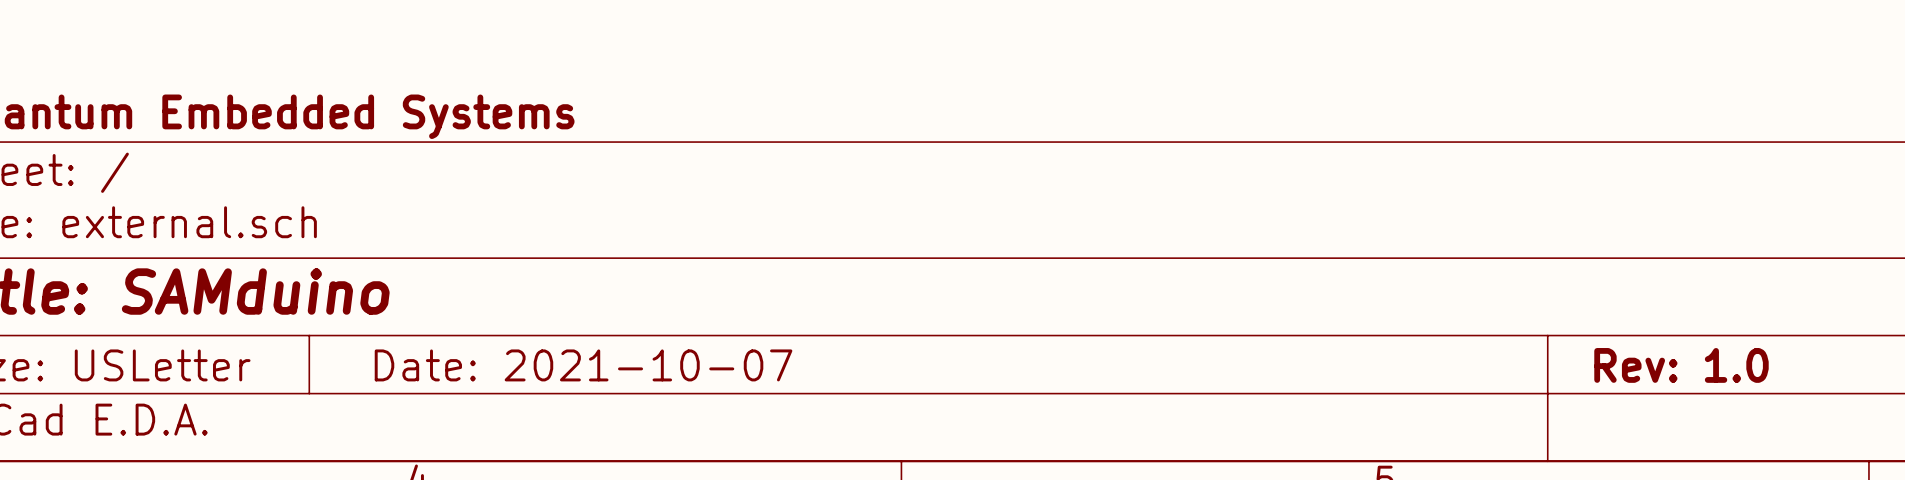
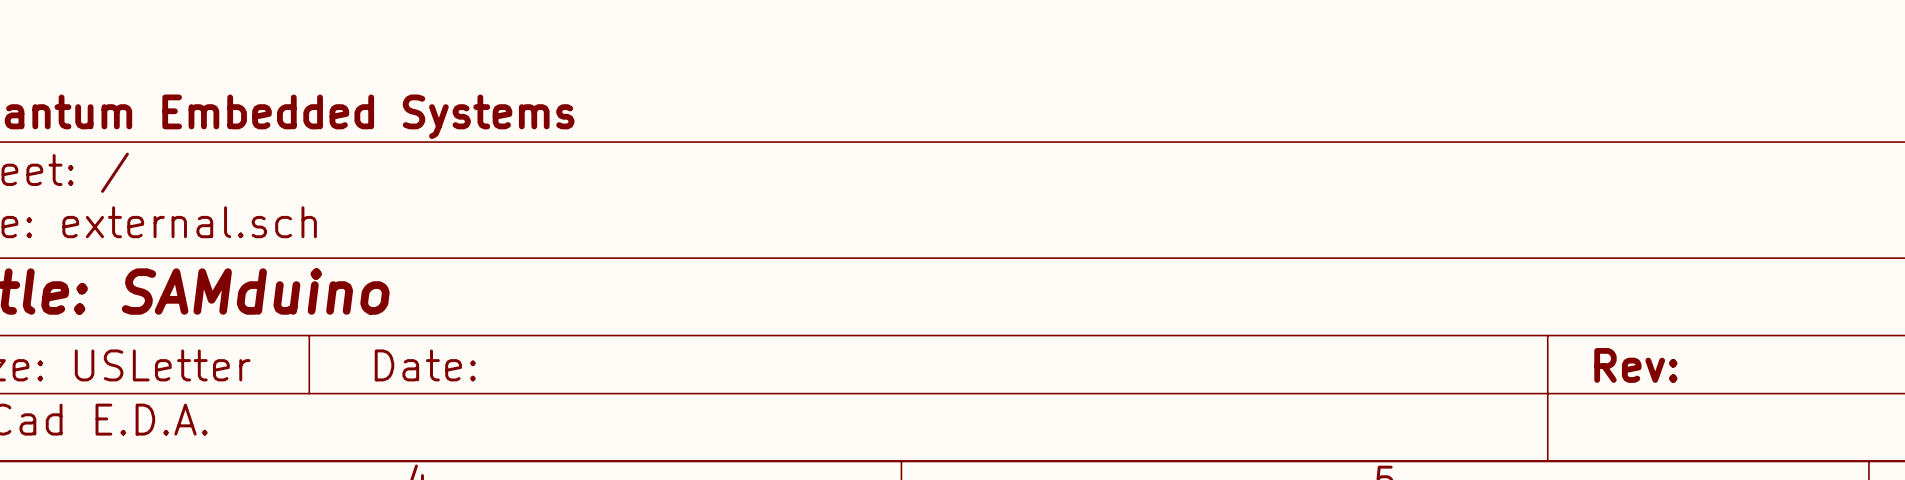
title block: Date: 2021-10-07 (583, 365) -> Date: (425, 365)
title block: Rev: 1.0 (1681, 365) -> Rev: (1635, 365)

